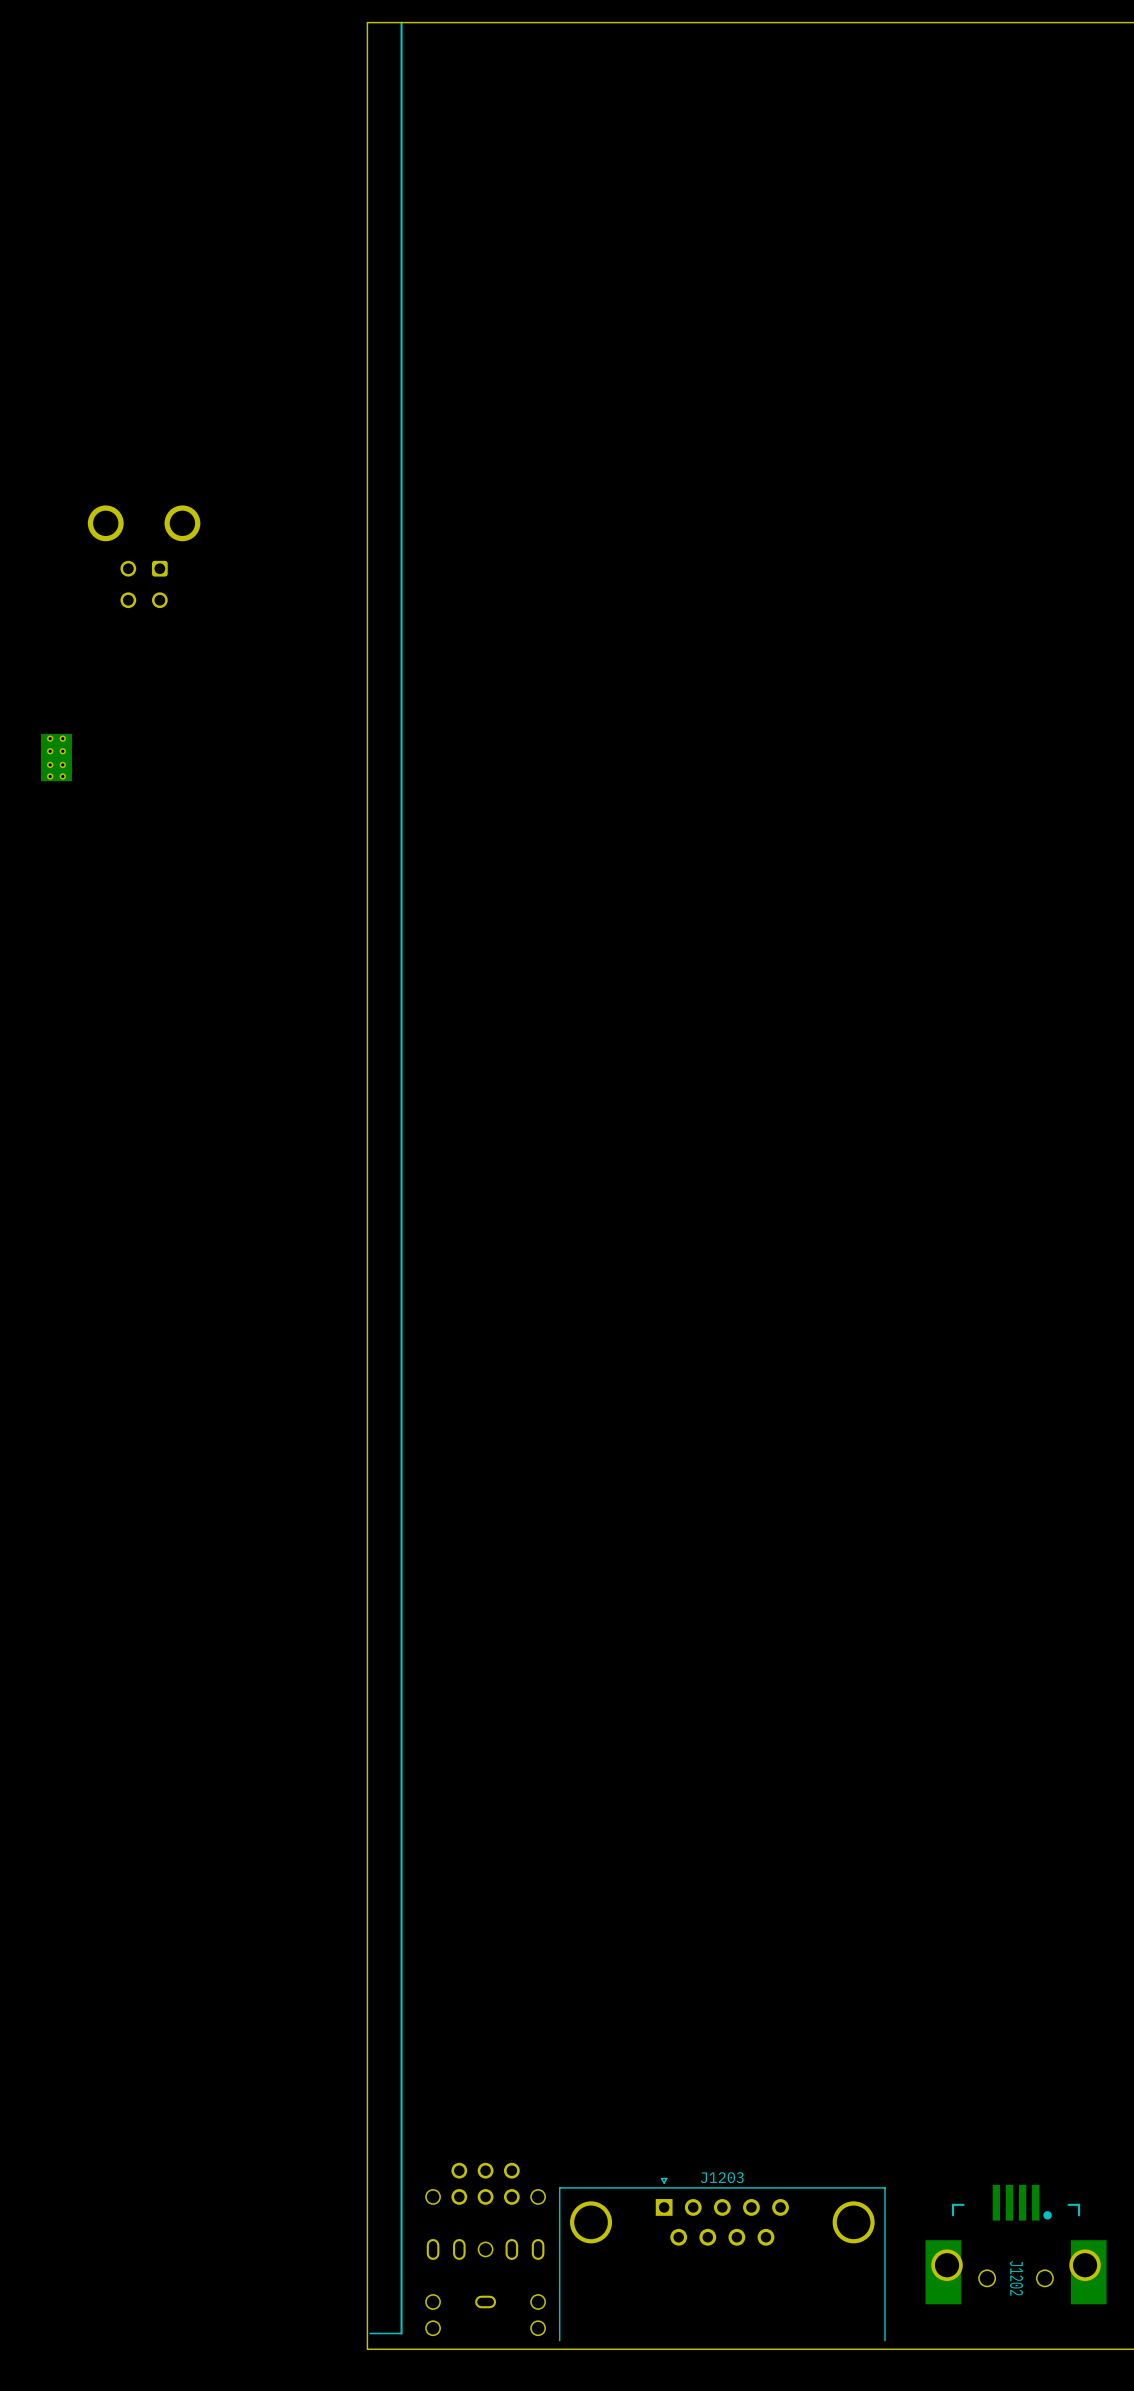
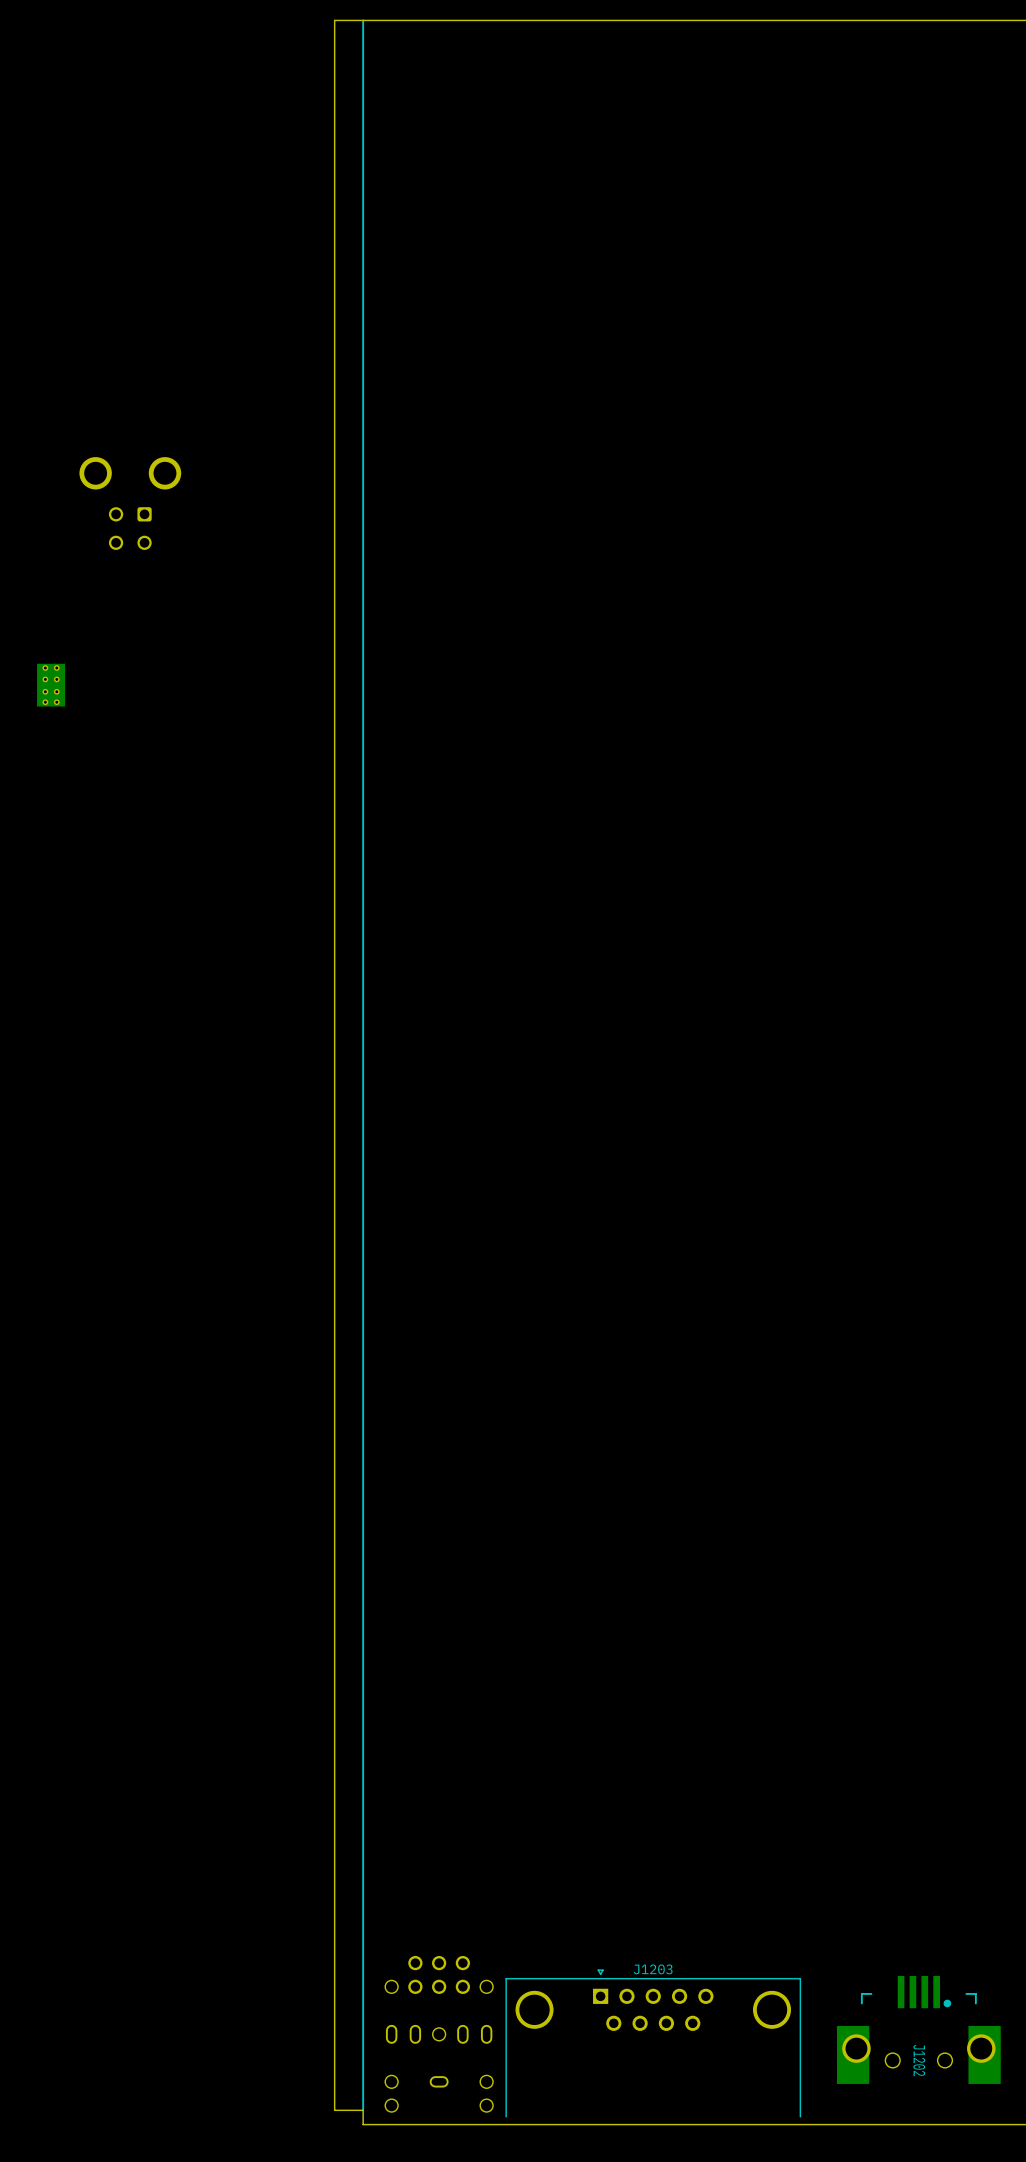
board edge: (370, 22) (367, 22) (367, 2349) (401, 2349) -> (334, 20) (334, 2110) (363, 2110) (363, 2124)
line: (401, 2333) (370, 2333) -> none

